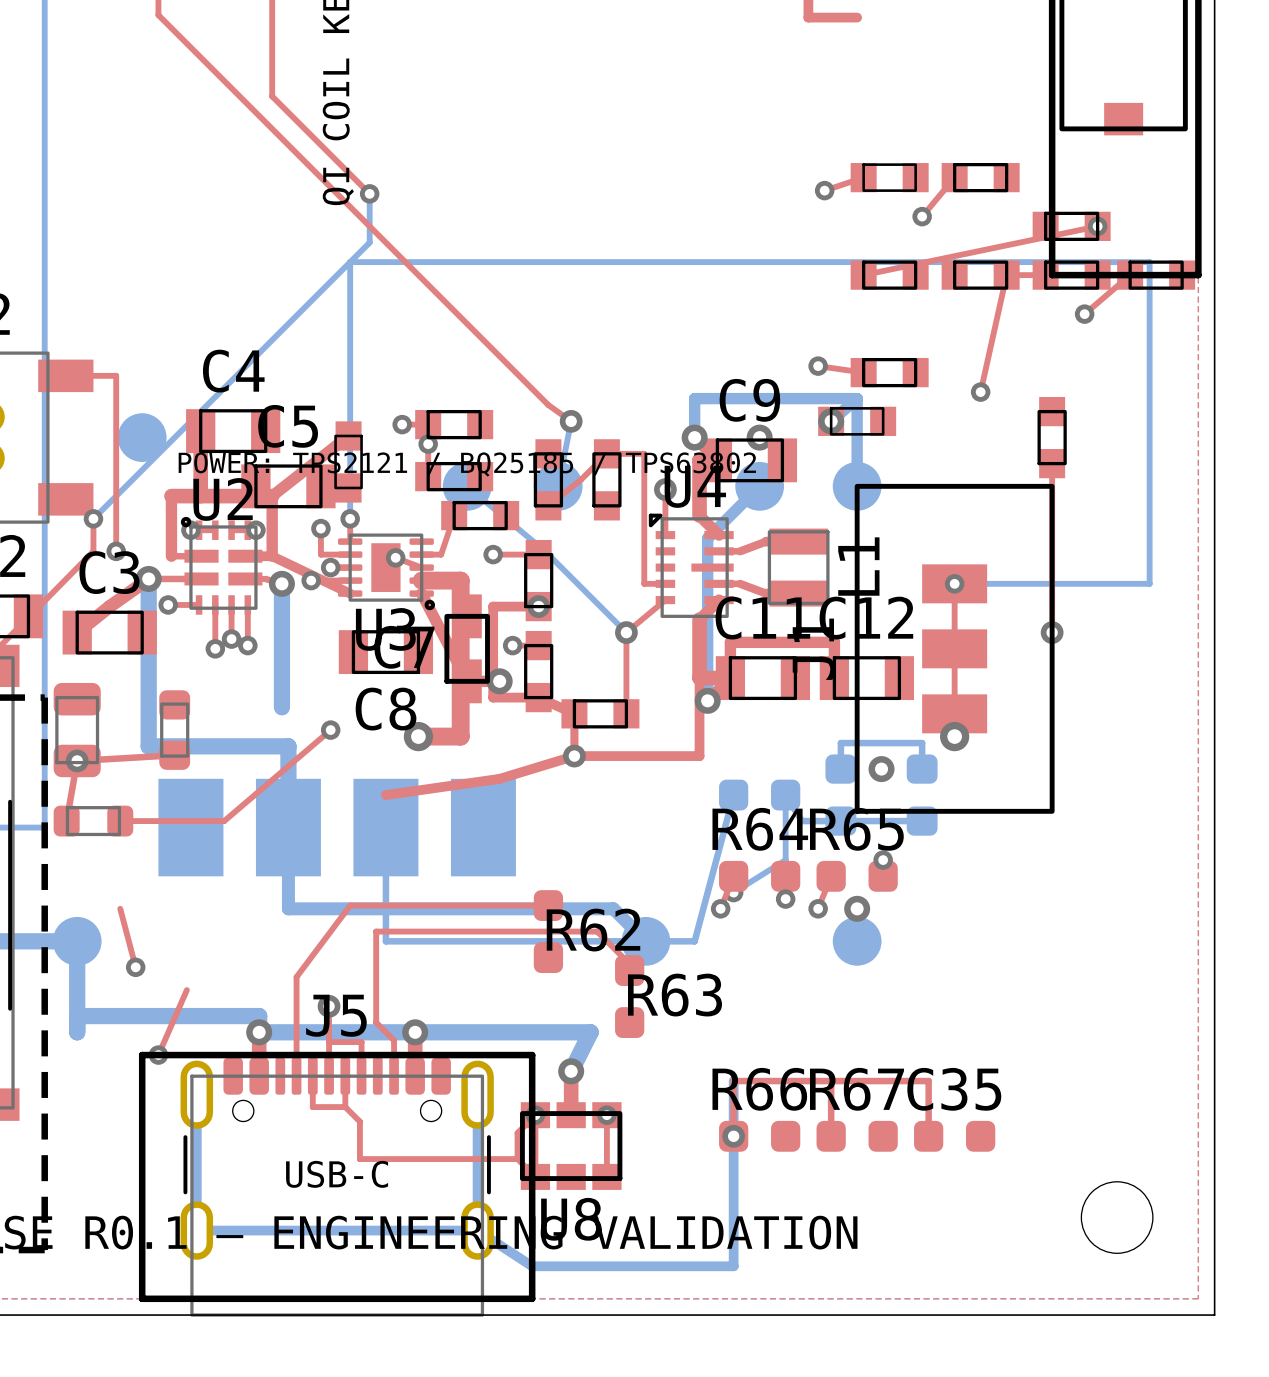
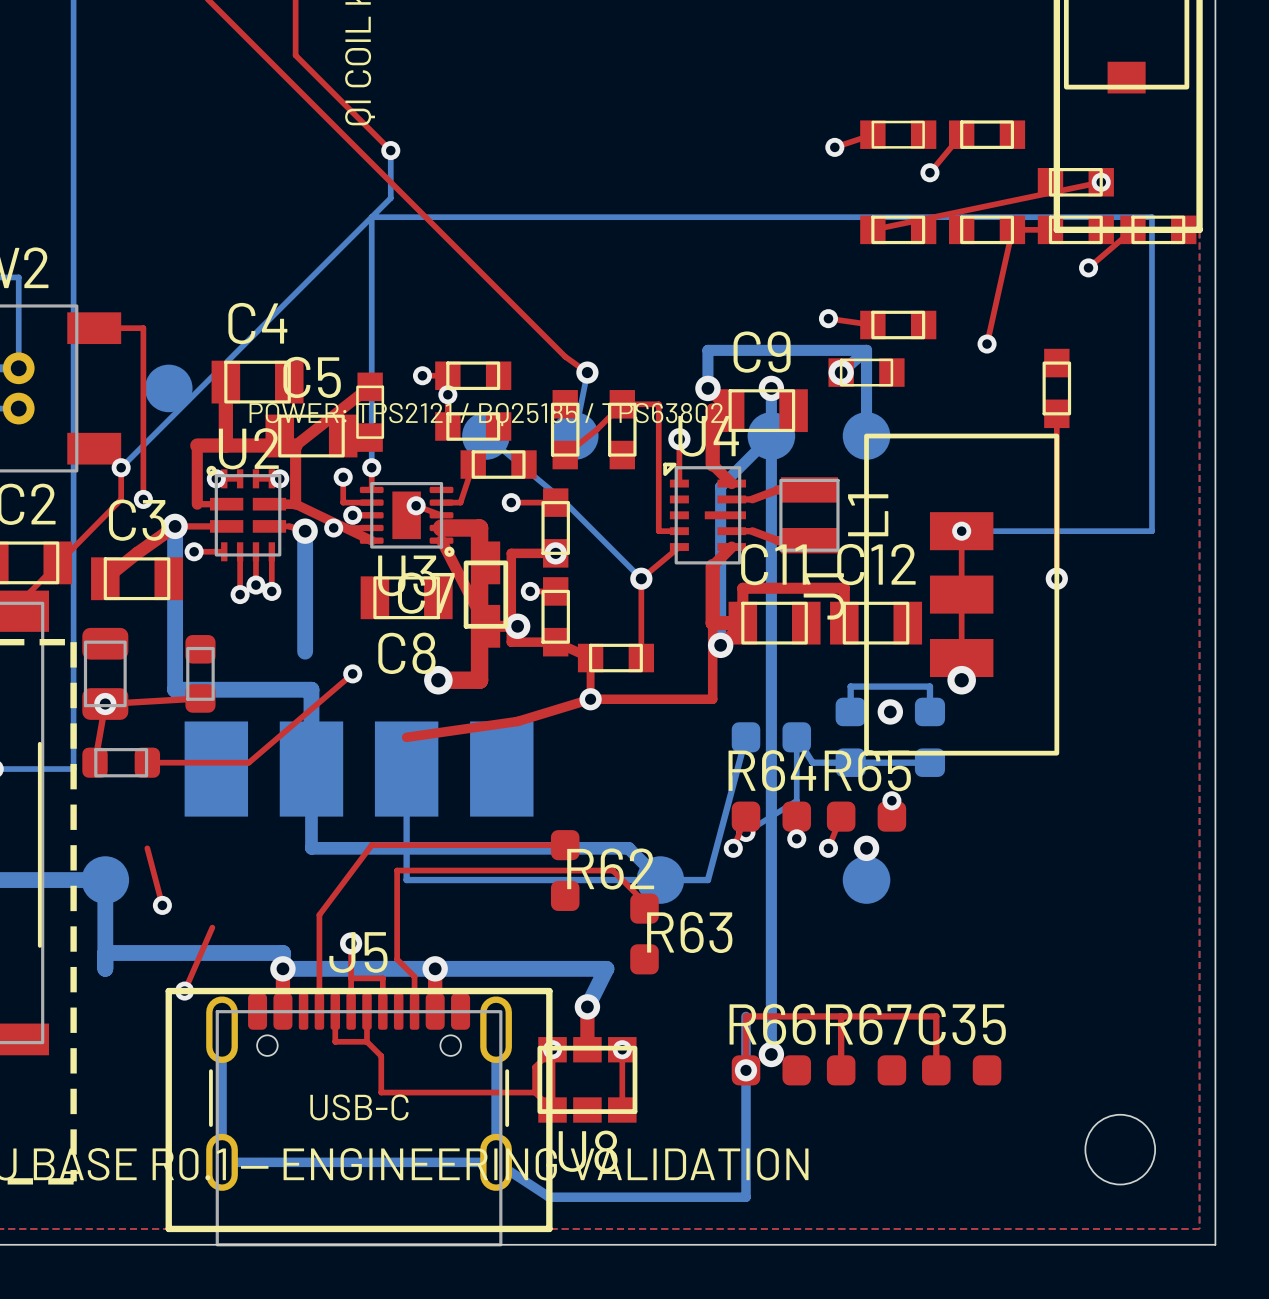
bottom track: none -> (771, 388) (771, 1054)
via: none -> (771, 1054)

